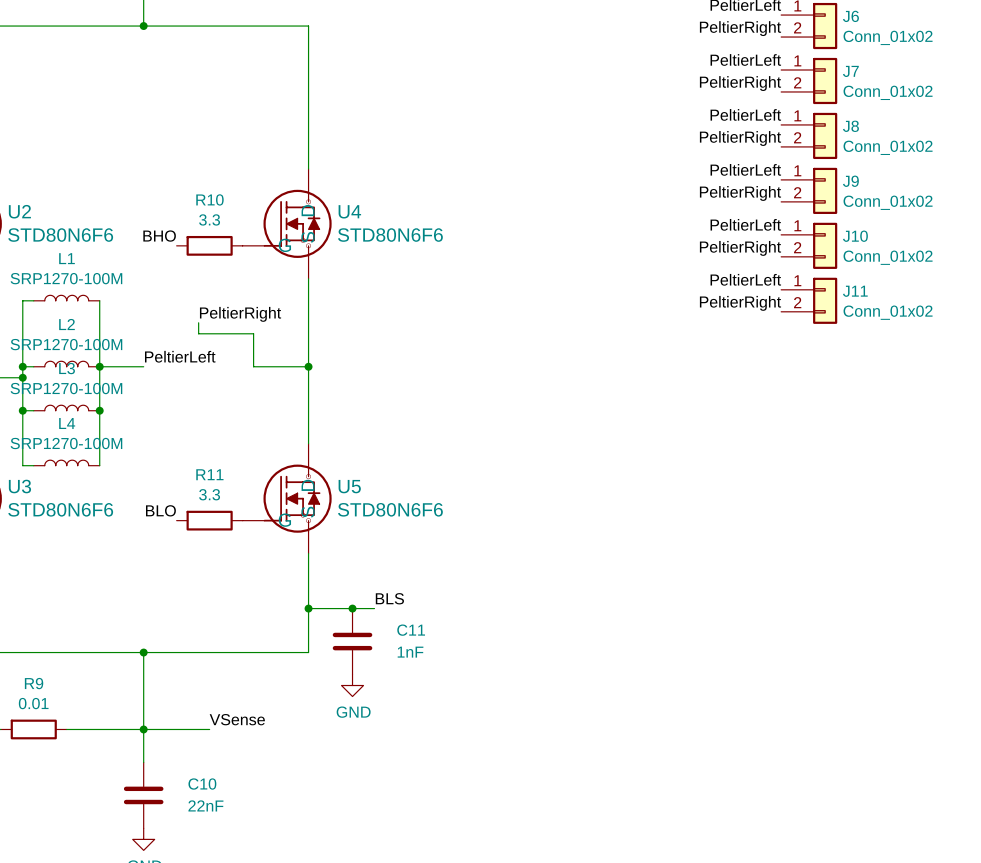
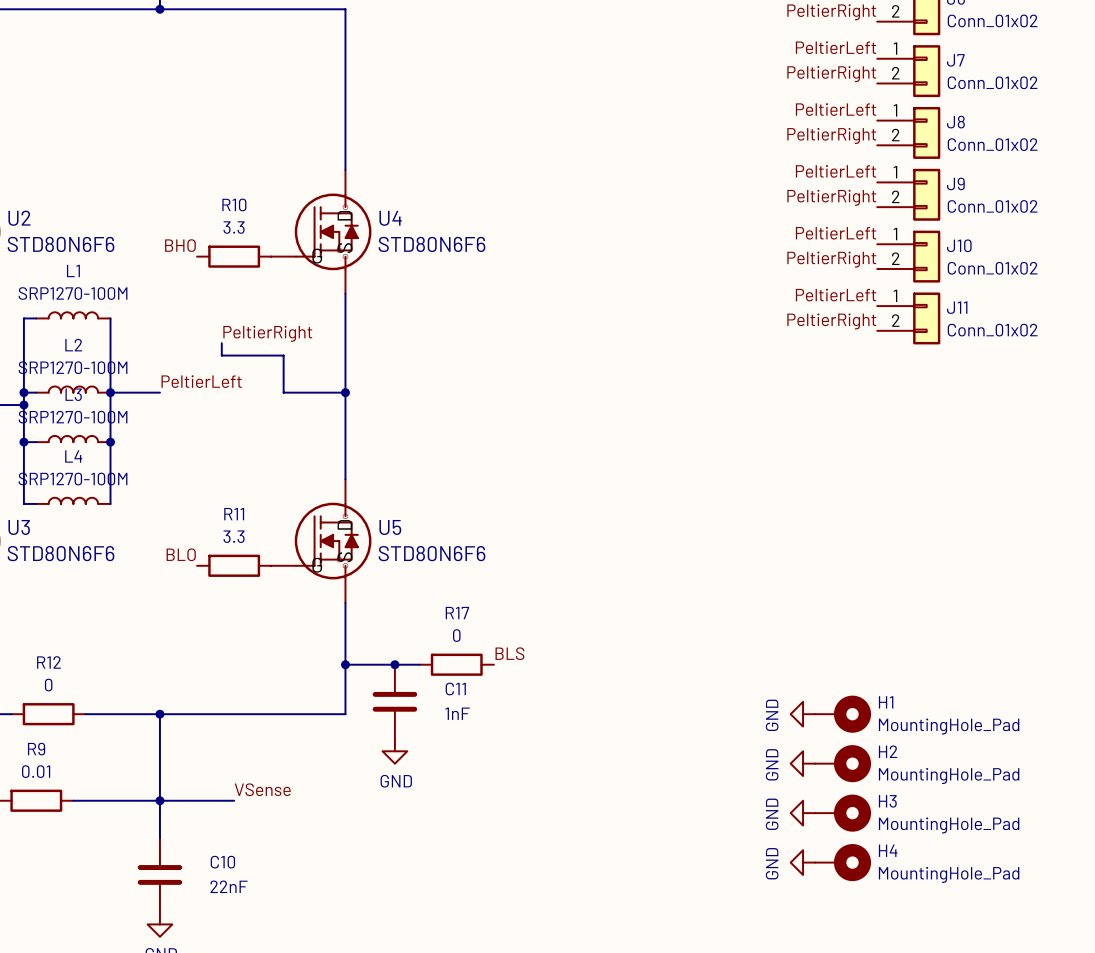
label position: BLS (389, 598) -> BLS (509, 653)
R17: none -> 0 (456, 664)
wire: (11, 652) (77, 652) -> none
R12: none -> 0 (48, 714)
power symbol: none -> GND (803, 714)
H1: none -> MountingHole_Pad (843, 714)
power symbol: none -> GND (803, 763)
H2: none -> MountingHole_Pad (843, 763)
power symbol: none -> GND (803, 813)
H3: none -> MountingHole_Pad (843, 813)
power symbol: none -> GND (803, 862)
H4: none -> MountingHole_Pad (843, 862)

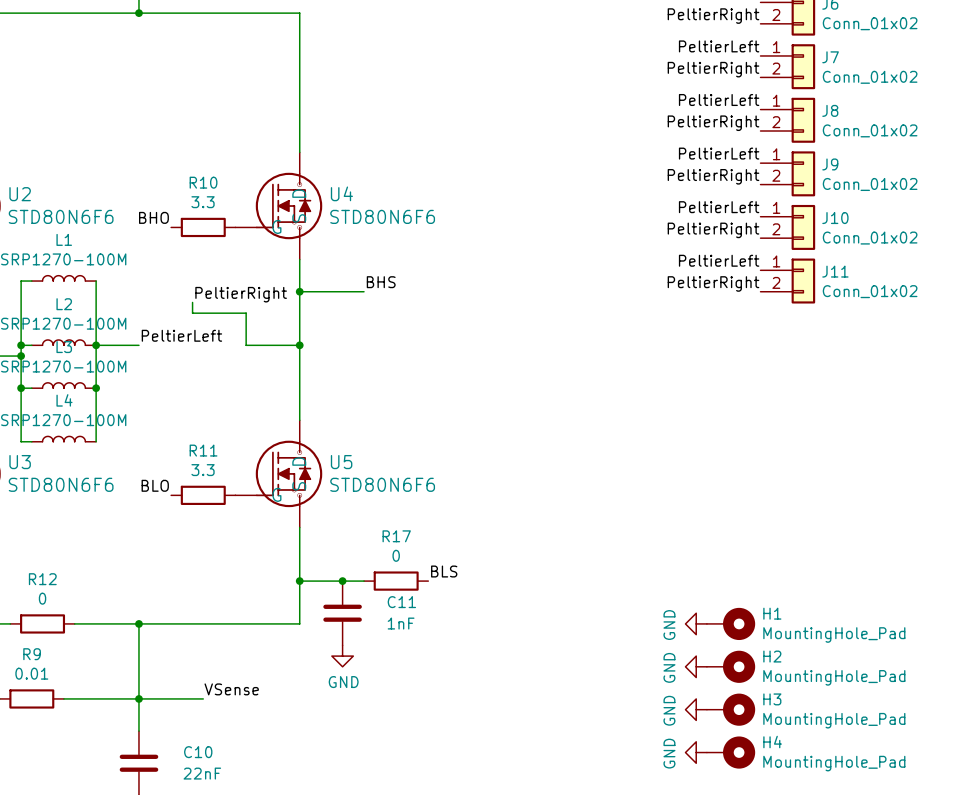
label: none -> BHS (381, 282)
wire: none -> (299, 291) (364, 291)
junction: none -> (299, 291)

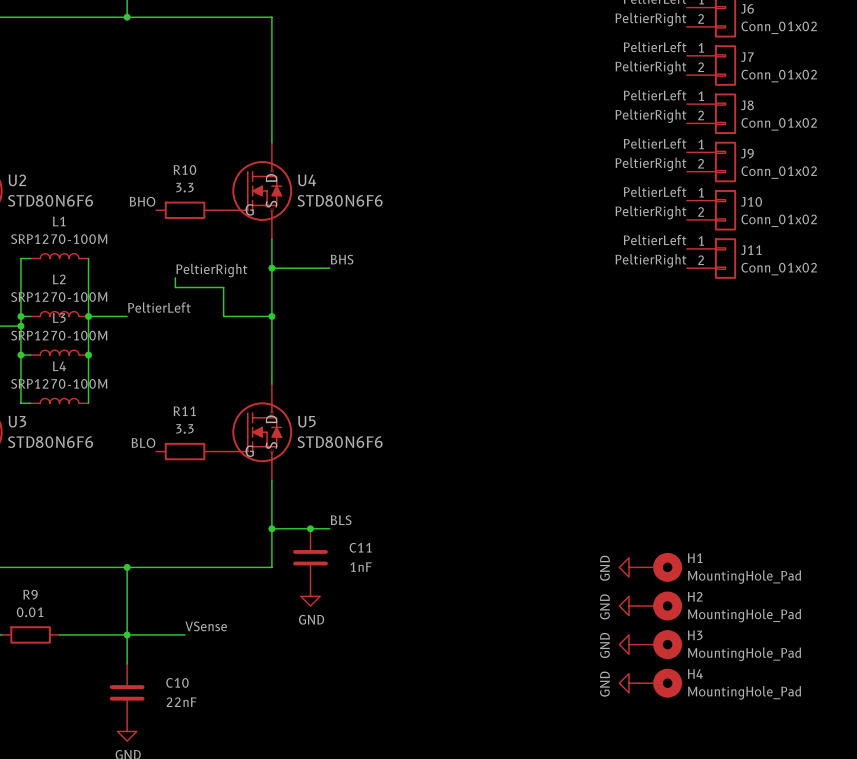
label position: BLS (444, 571) -> BLS (341, 520)
R17: 0 (396, 581) -> none
wire: none -> (11, 567) (69, 567)
R12: 0 (42, 623) -> none

